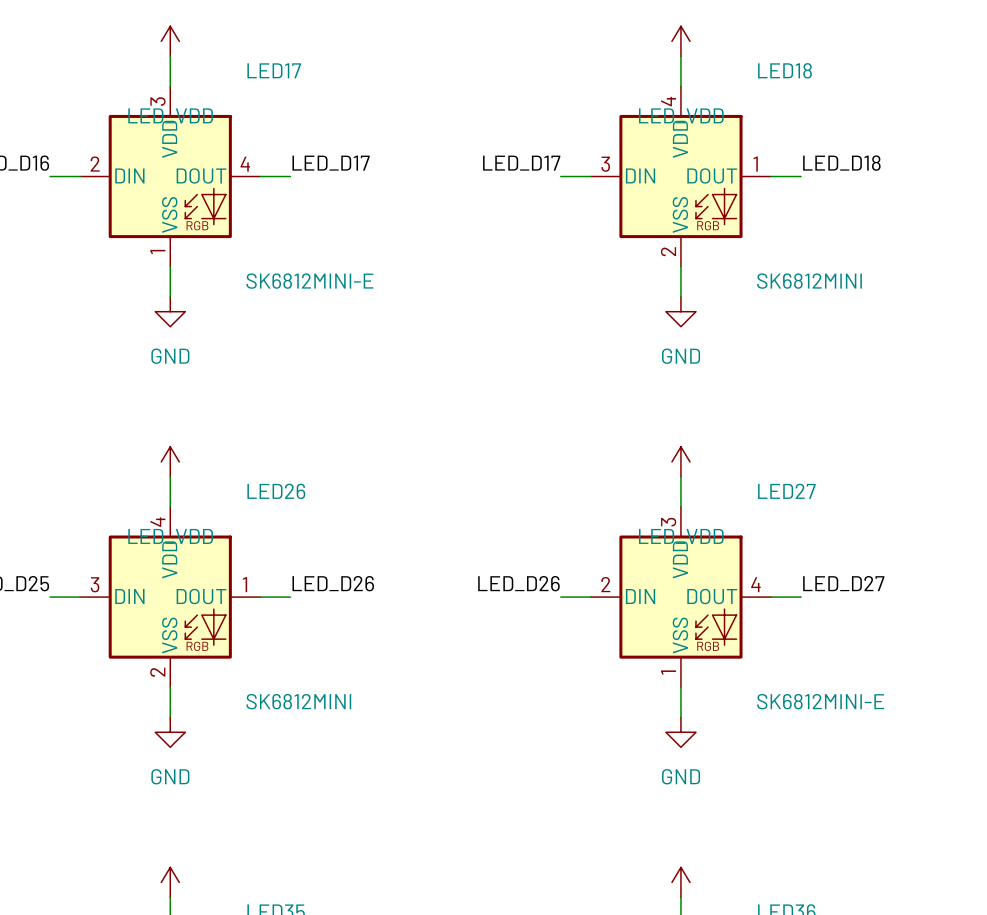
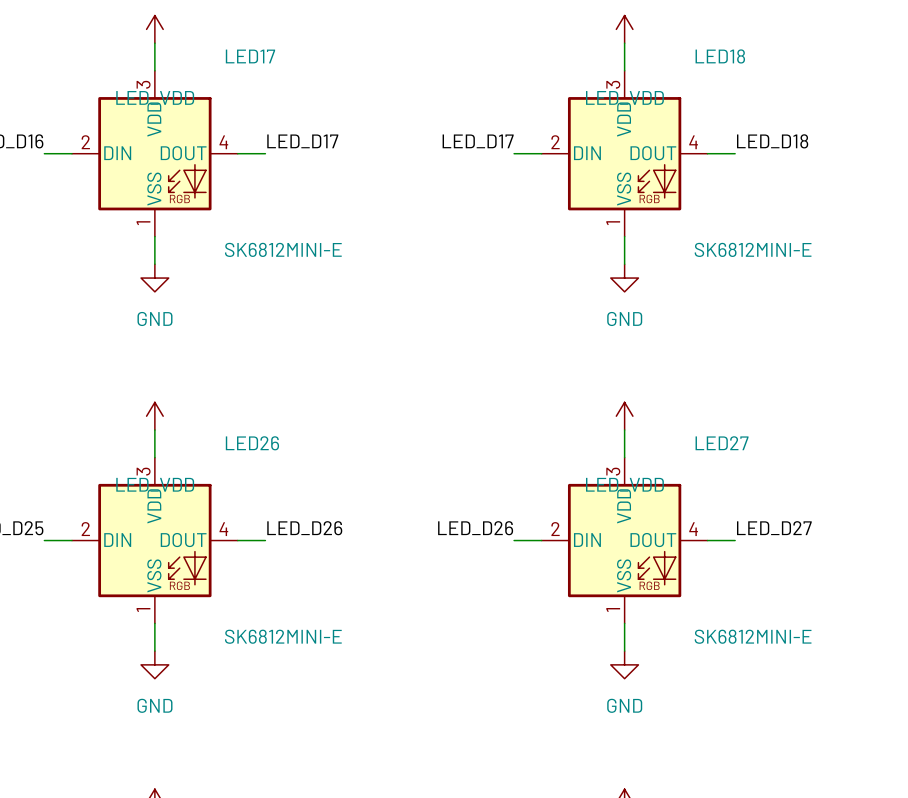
LED18 pin number: 4 (668, 101) -> 3 (613, 84)
LED18 pin number: 3 (605, 164) -> 2 (555, 142)
LED18 pin number: 1 (755, 164) -> 4 (693, 142)
LED18 pin number: 2 (668, 251) -> 1 (613, 223)
LED18 value: SK6812MINI (809, 281) -> SK6812MINI-E (753, 249)
LED26 pin number: 4 (157, 522) -> 3 (143, 471)
LED26 pin number: 3 (95, 584) -> 2 (85, 529)
LED26 pin number: 1 (245, 584) -> 4 (223, 529)
LED26 pin number: 2 (157, 672) -> 1 (143, 609)
LED26 value: SK6812MINI (298, 701) -> SK6812MINI-E (283, 636)

